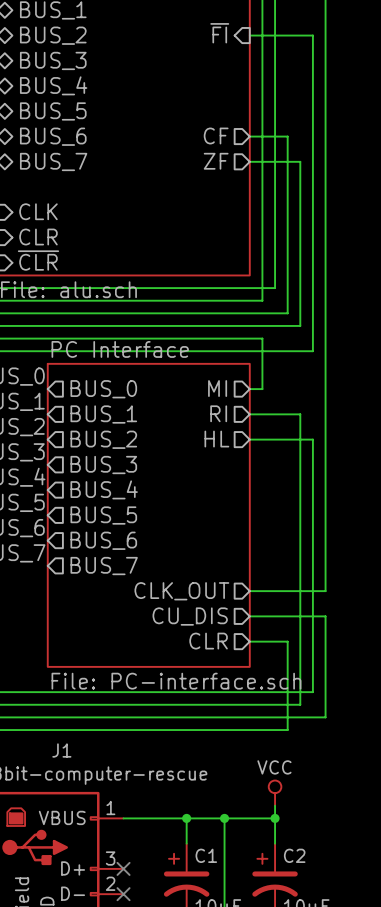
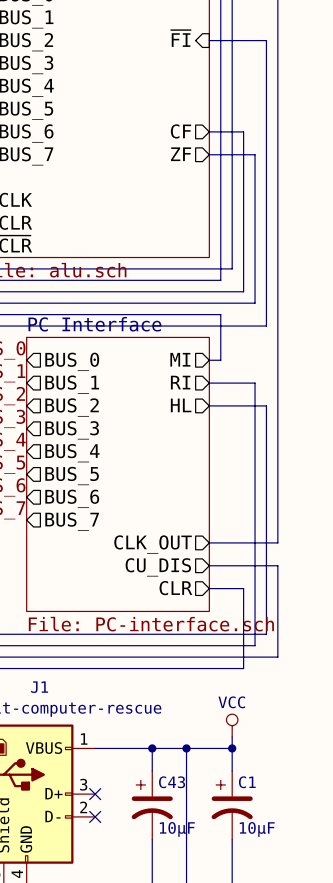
C1 name: C1 (206, 855) -> C43 (172, 782)
C2 name: C2 (294, 855) -> C1 (247, 782)

